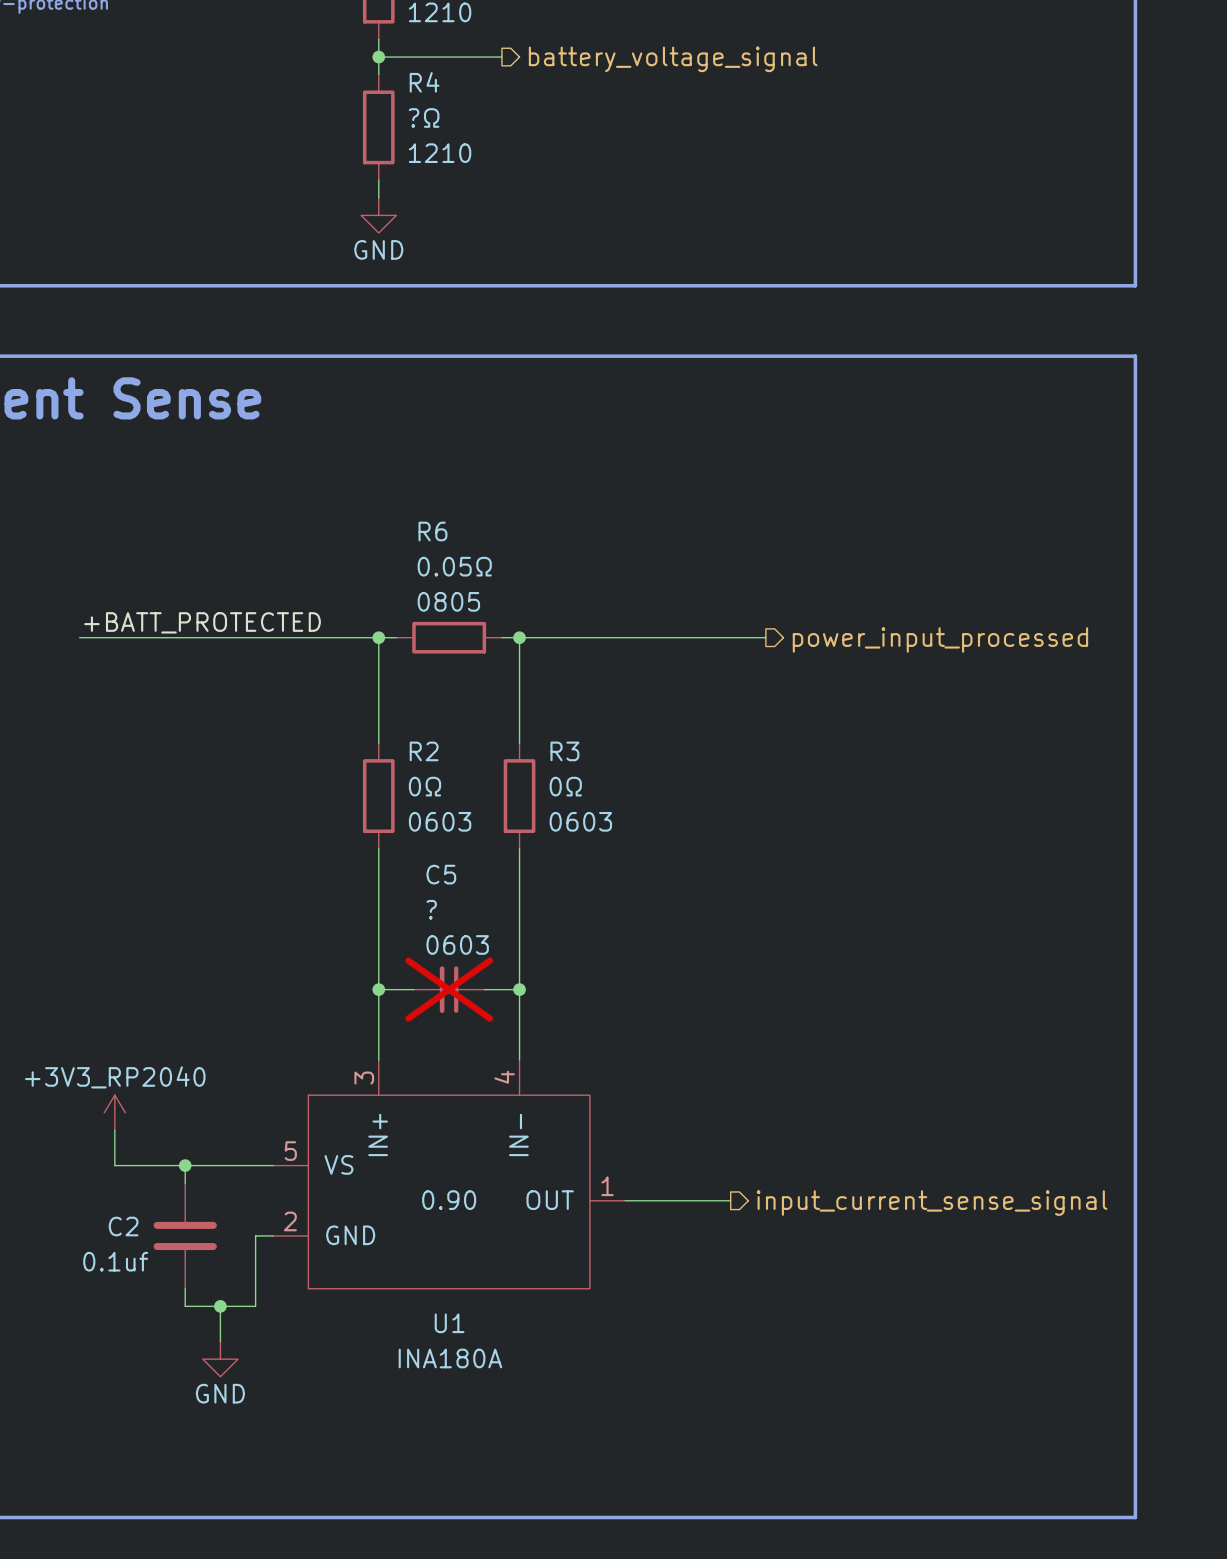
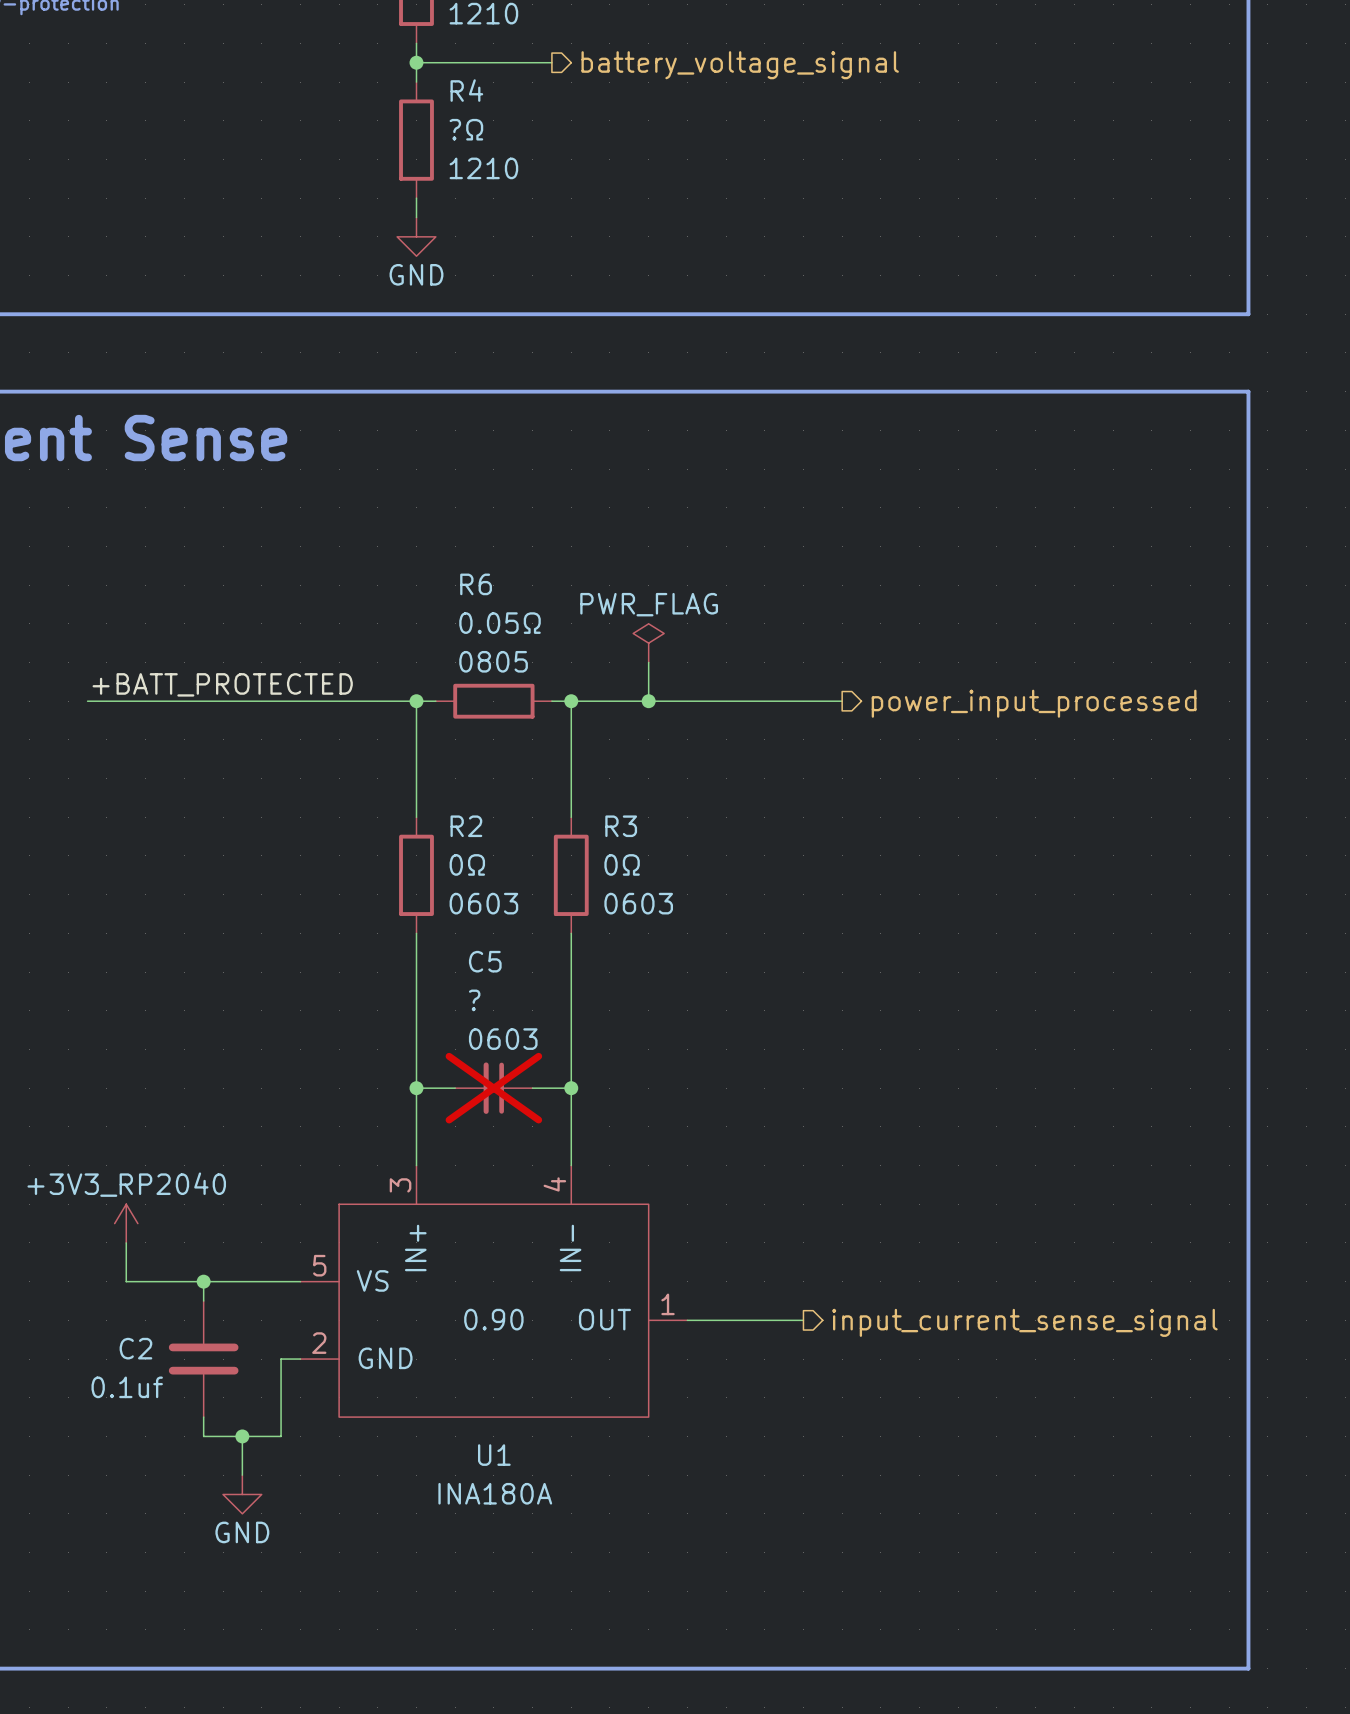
power symbol: none -> PWR_FLAG (648, 643)
wire: none -> (648, 662) (648, 701)
junction: none -> (648, 701)

